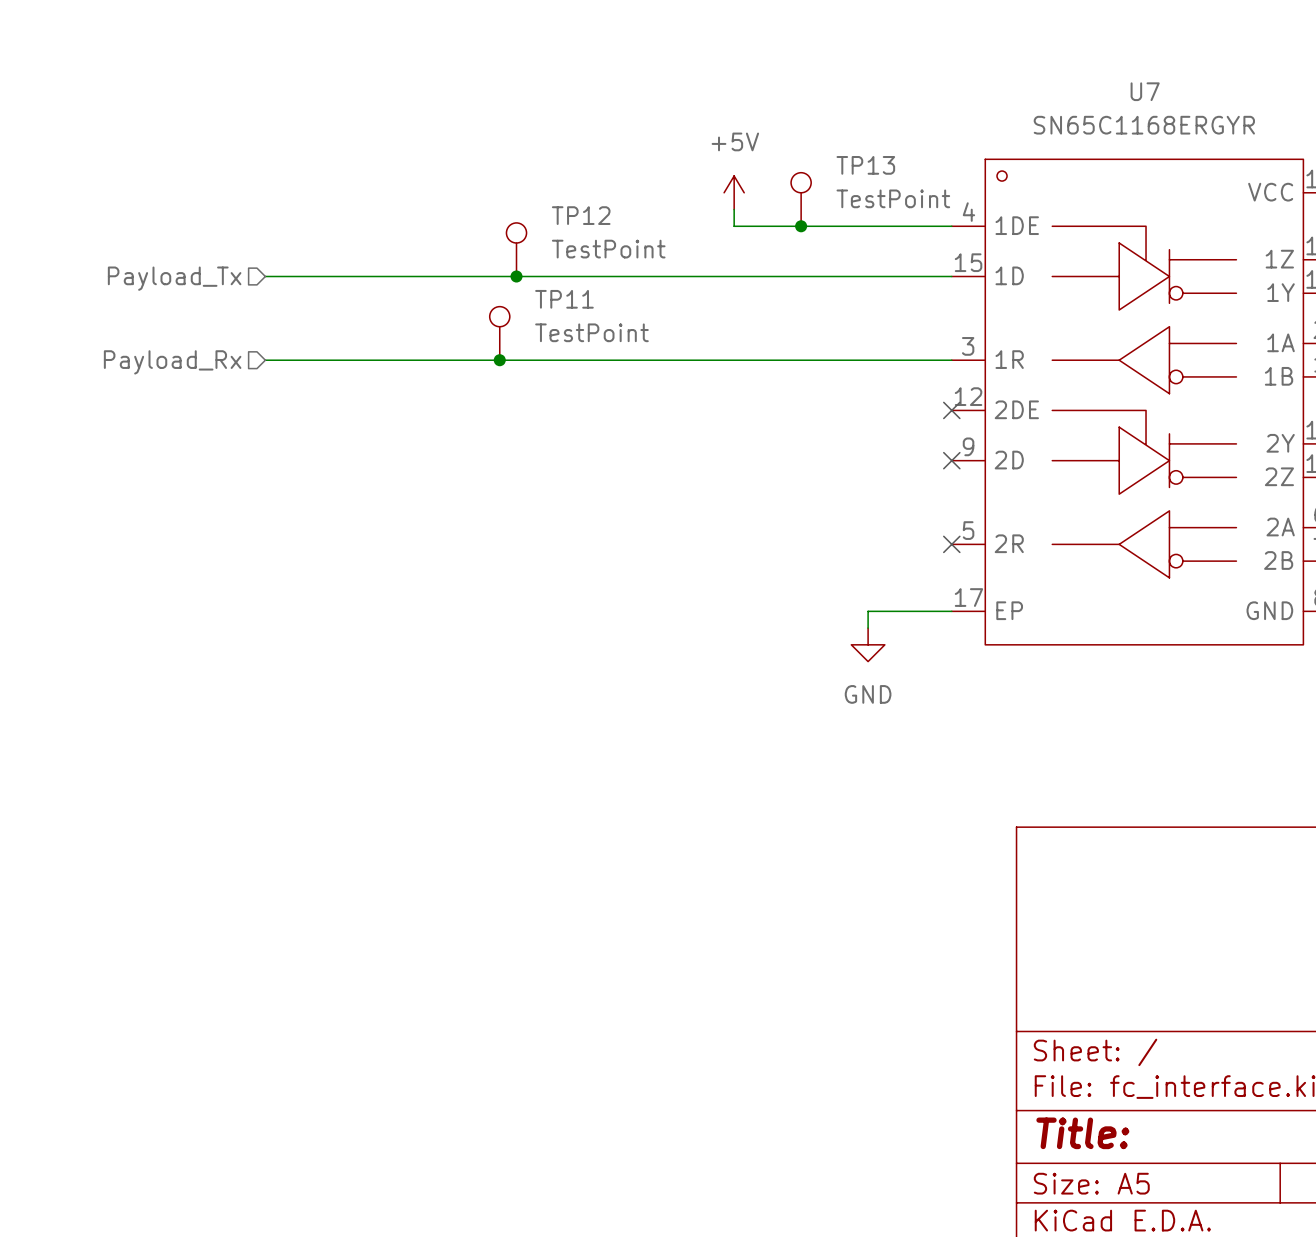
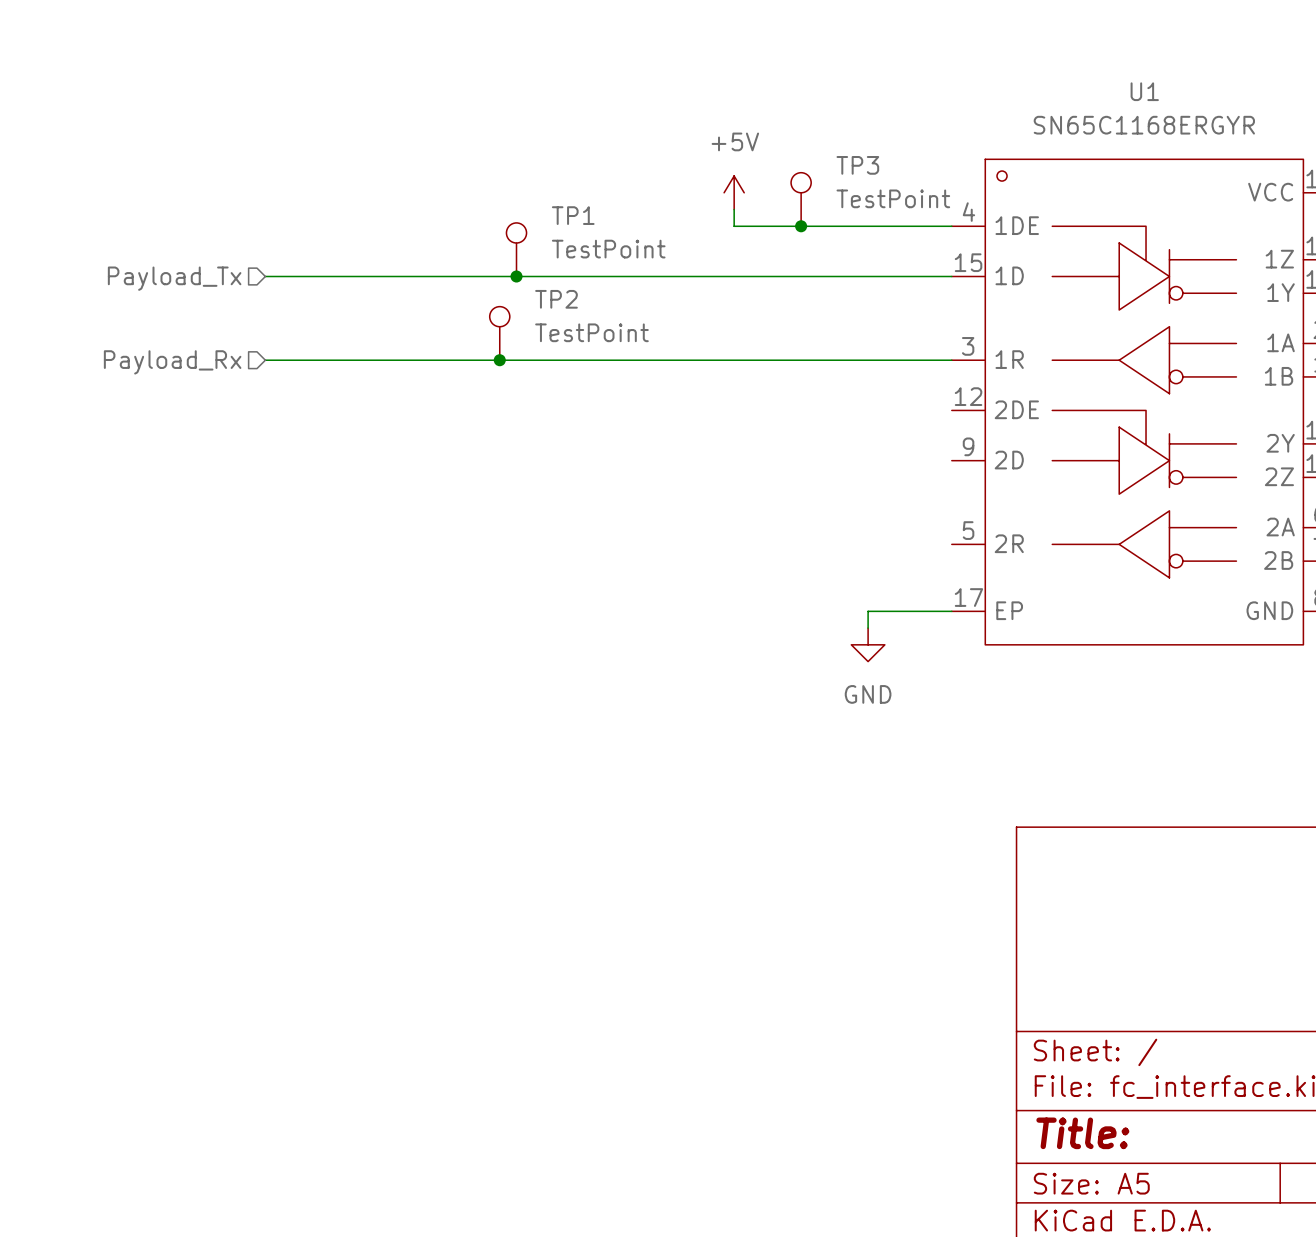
U7 name: U7 (1145, 91) -> U1 (1144, 91)
TP13 name: TP13 (865, 165) -> TP3 (857, 165)
TP12 name: TP12 (581, 215) -> TP1 (573, 215)
TP11 name: TP11 (564, 299) -> TP2 (556, 299)
no-connect mark: (951, 410) -> none
no-connect mark: (951, 460) -> none
no-connect mark: (951, 544) -> none

